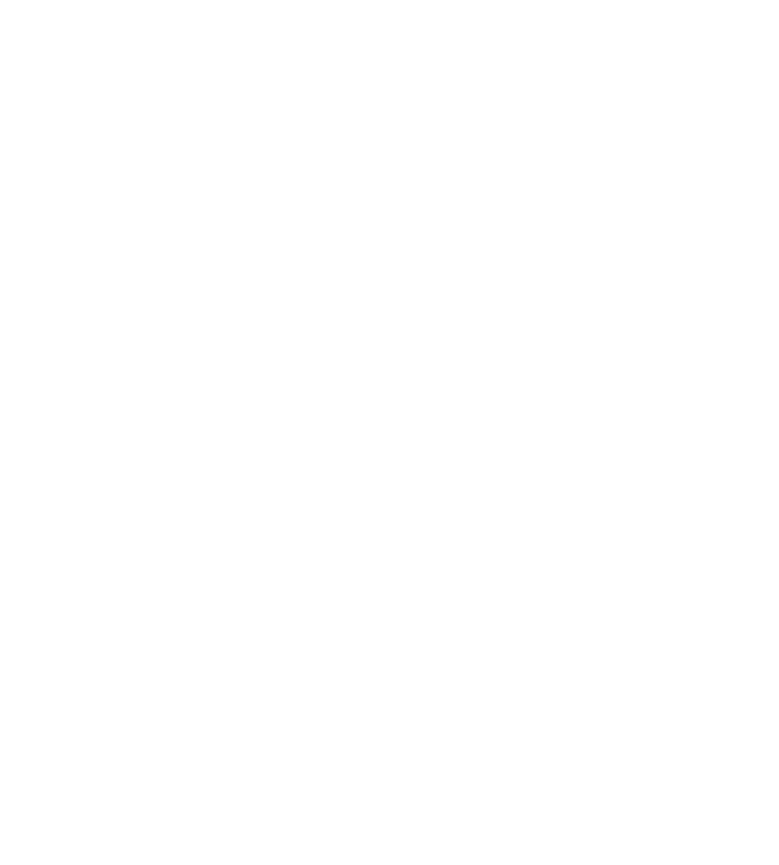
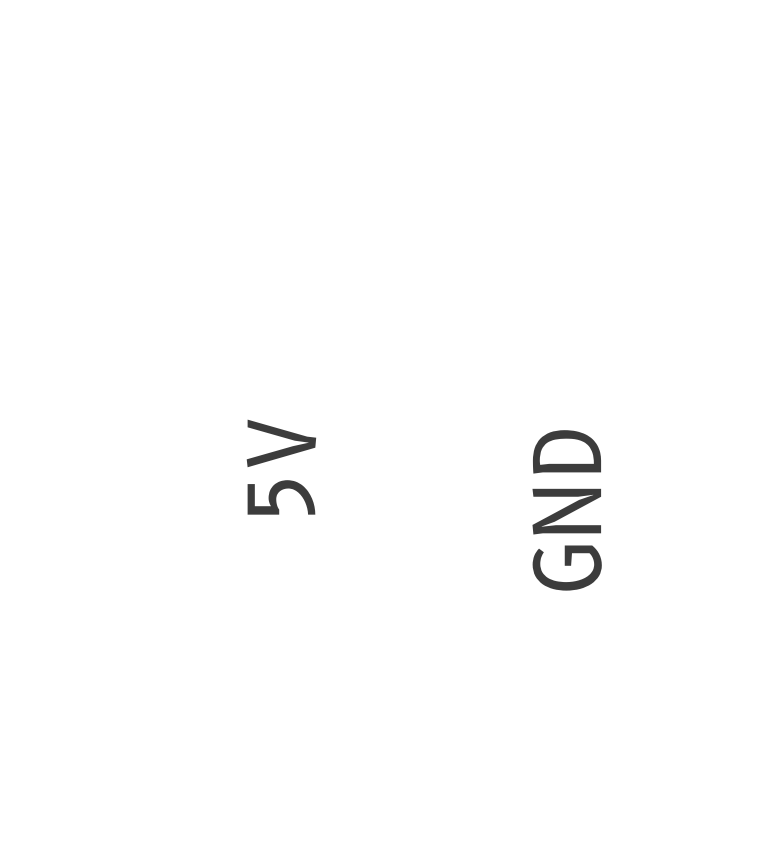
text: none -> 5V (281, 467)
text: none -> GND (567, 510)

